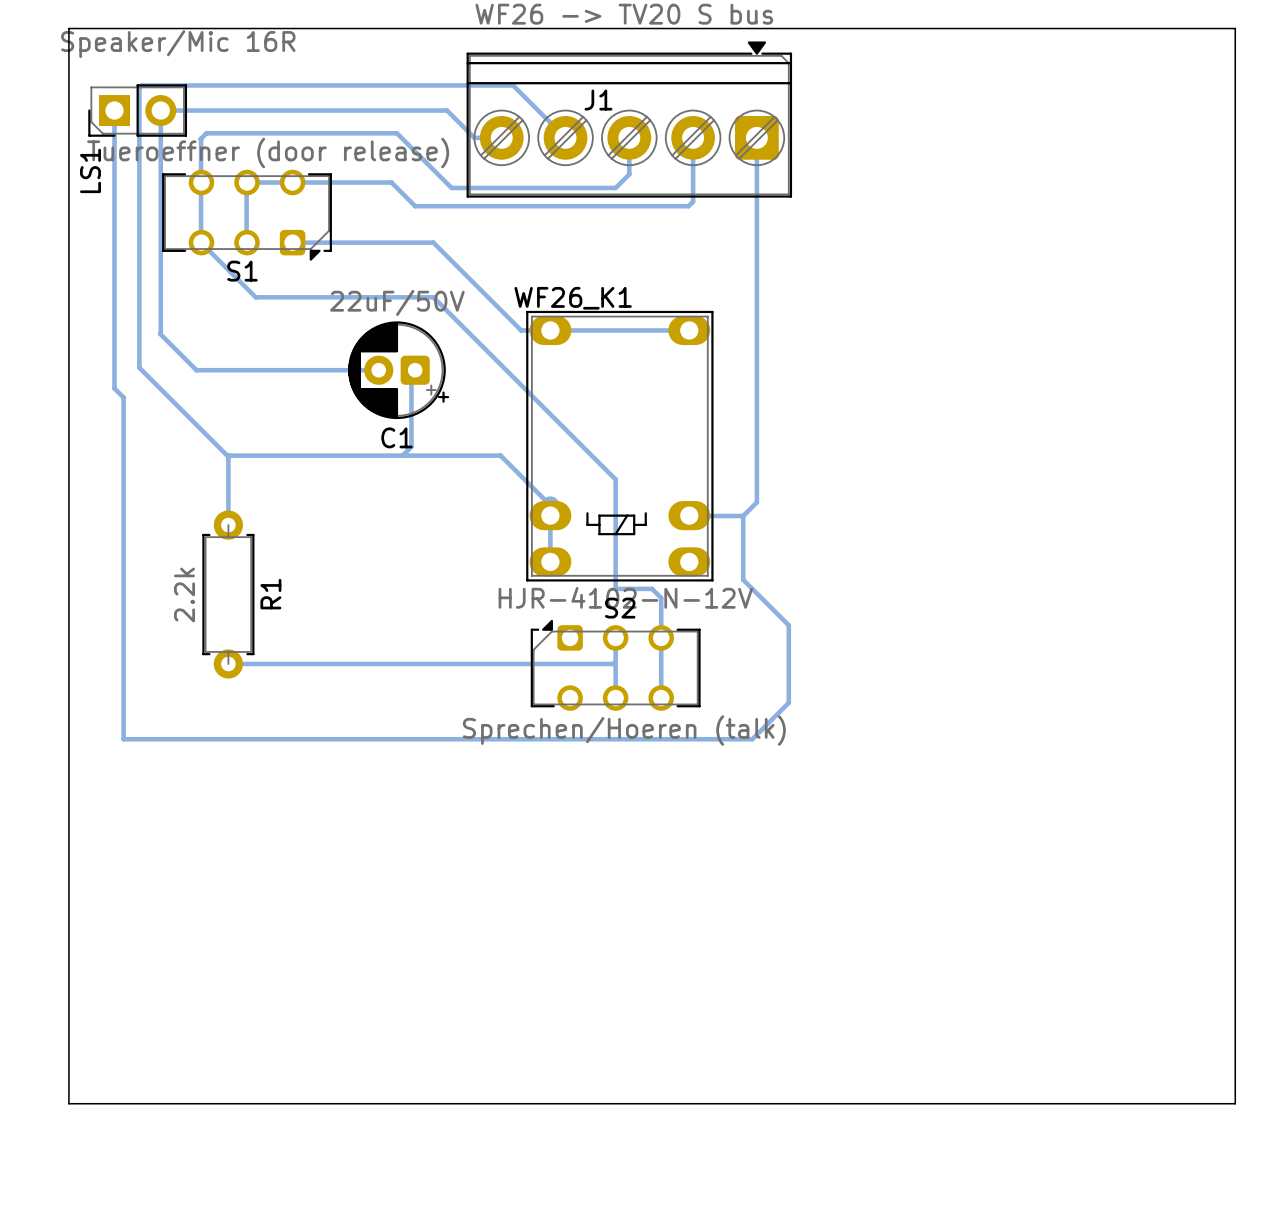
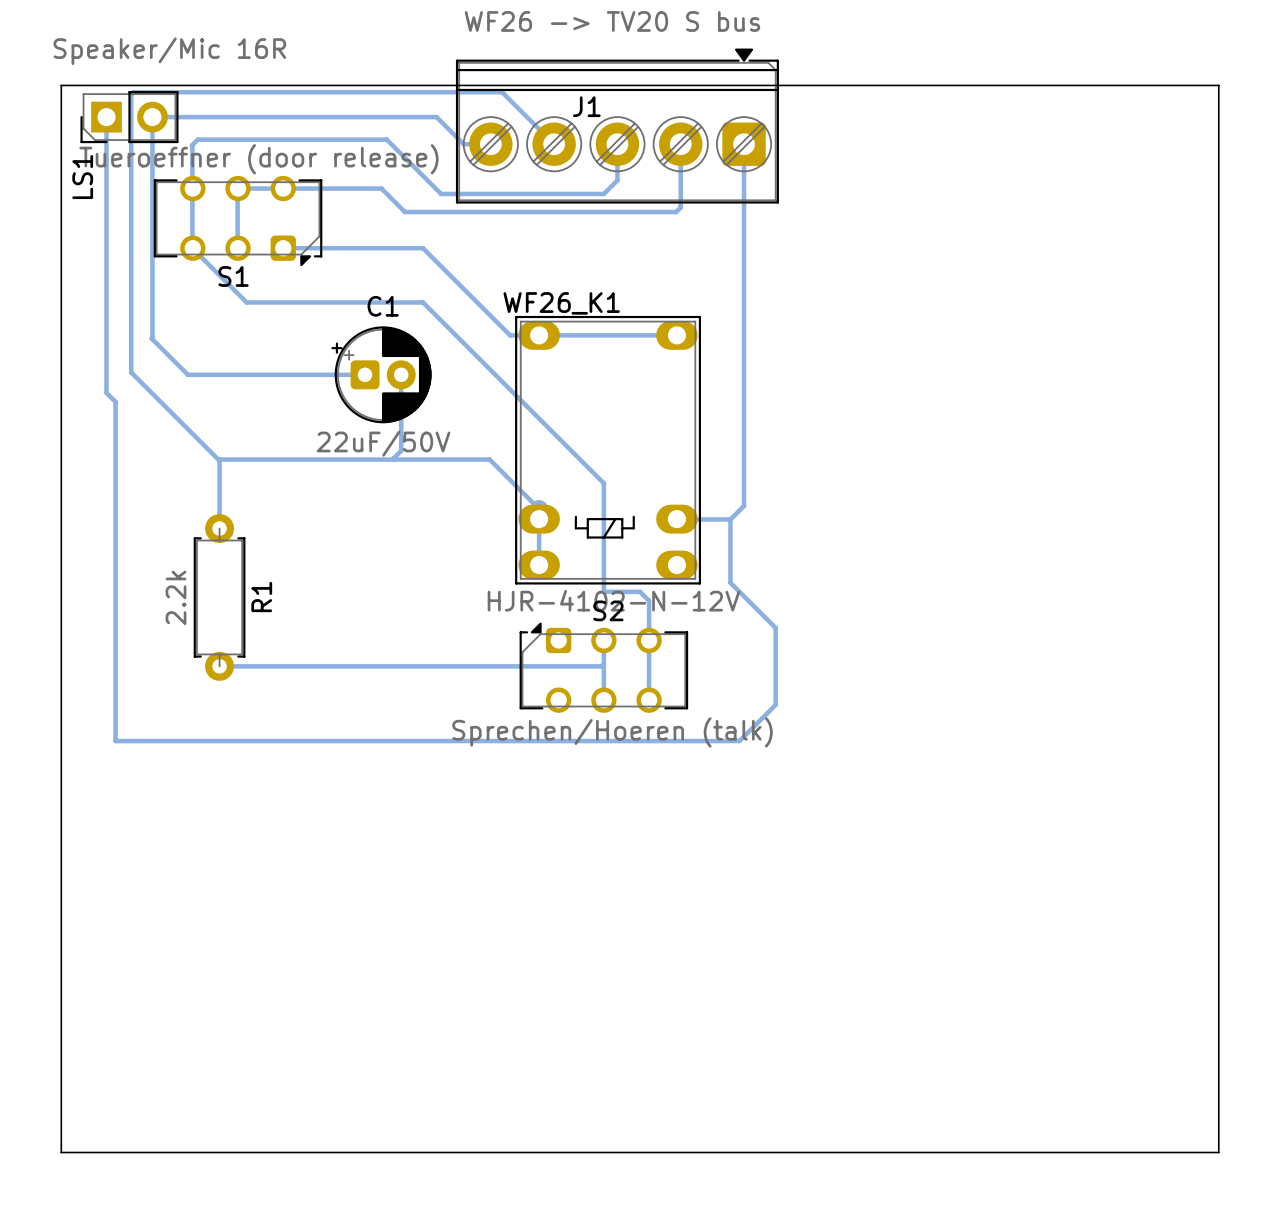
board edge: (68, 78) (68, 28) (1235, 28) (1235, 78) -> (61, 85) (1218, 85)
C1 rotation: 0° (398, 370) -> 180° (381, 374)
board edge: (68, 1103) (1235, 1103) -> (61, 1102) (61, 1152) (1218, 1152) (1218, 1102)

